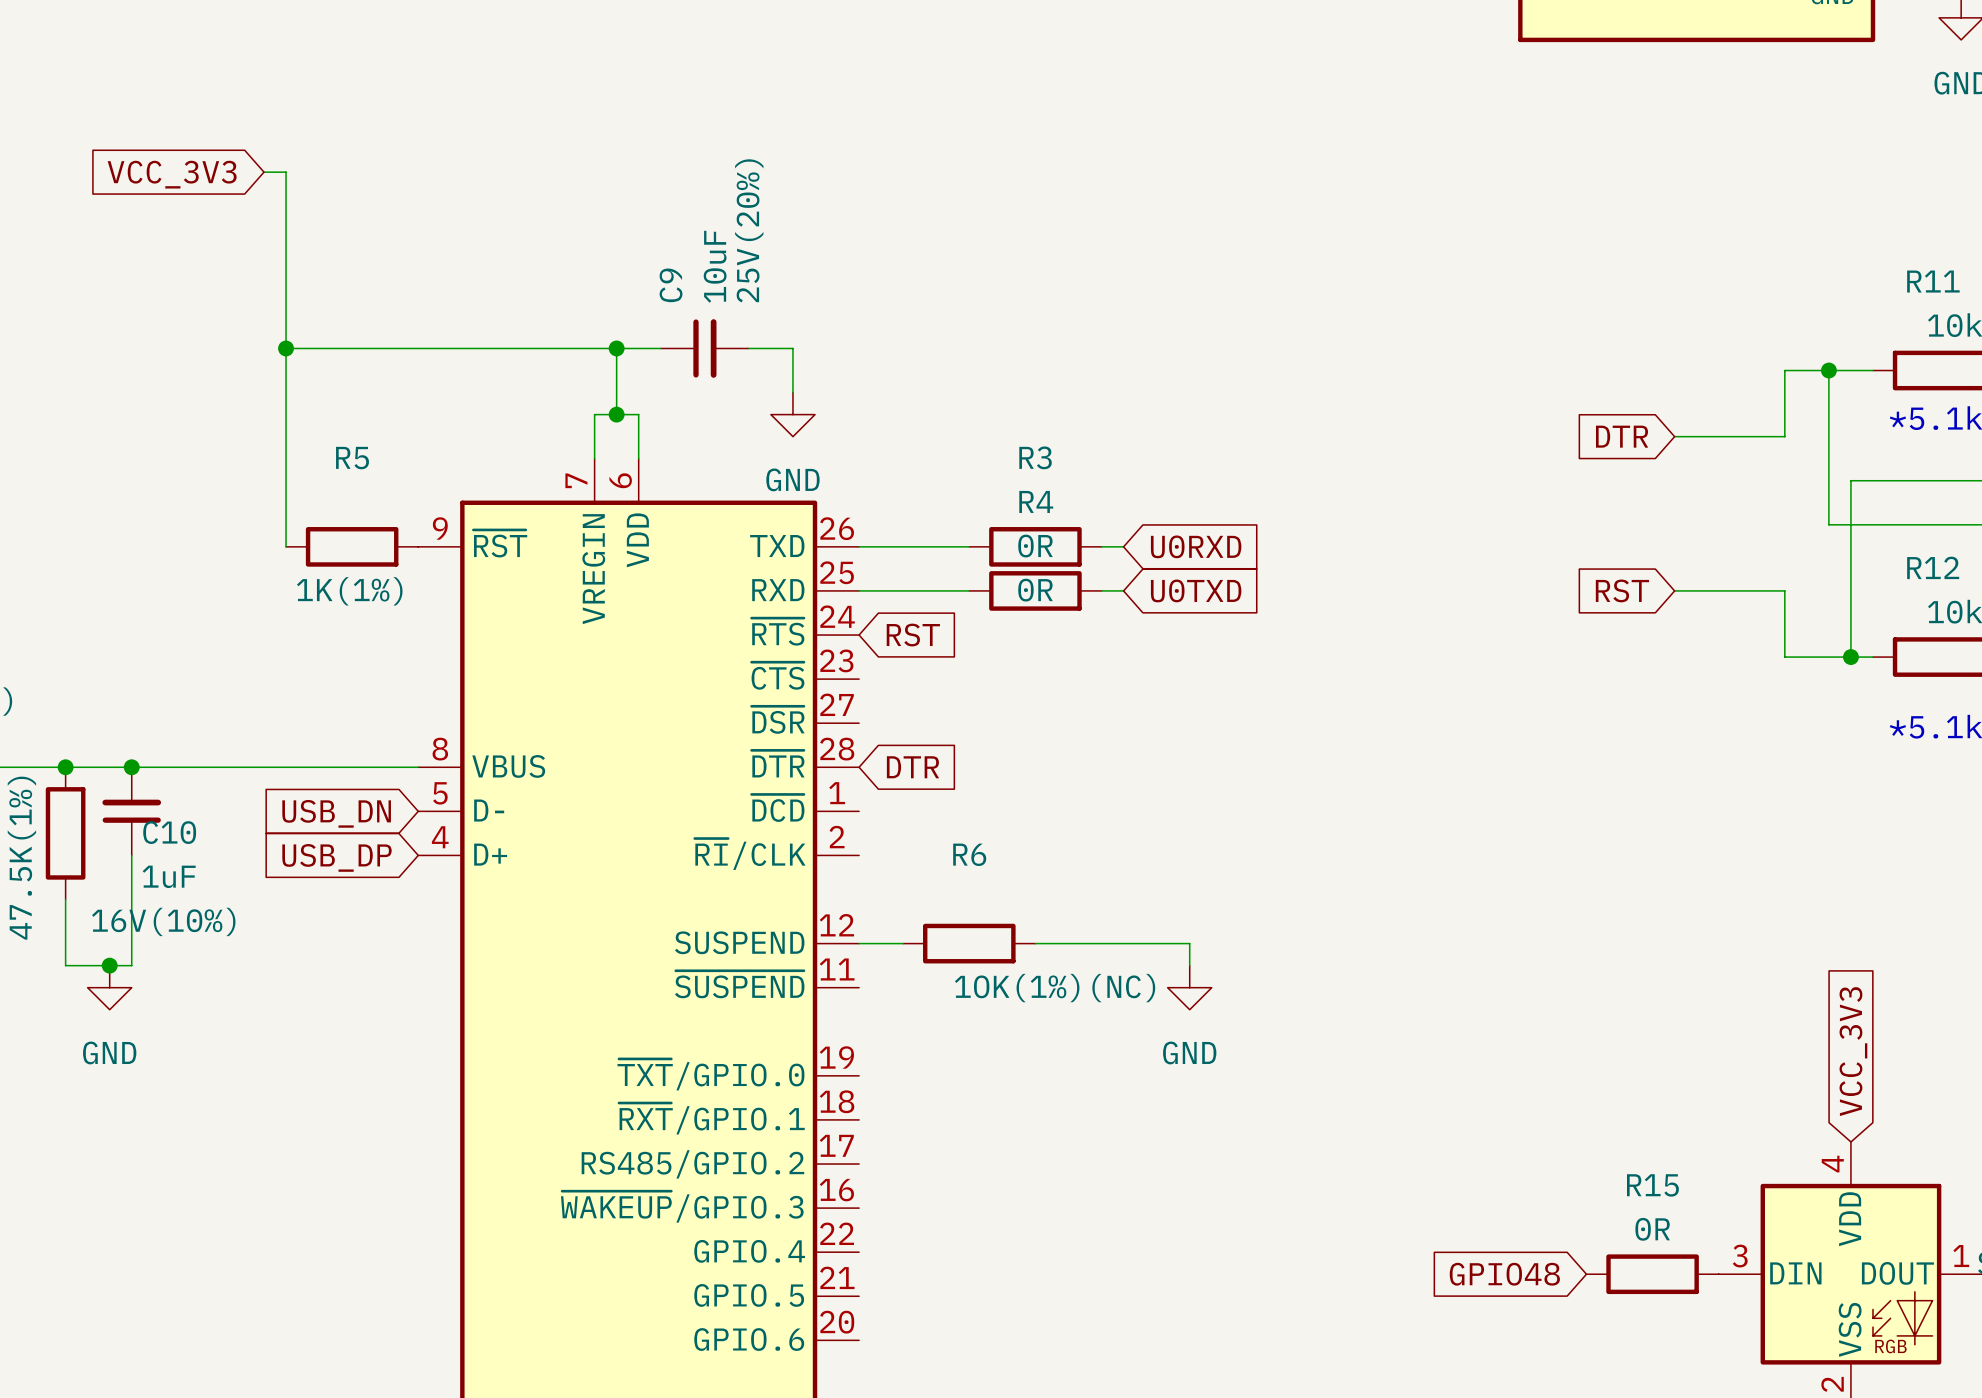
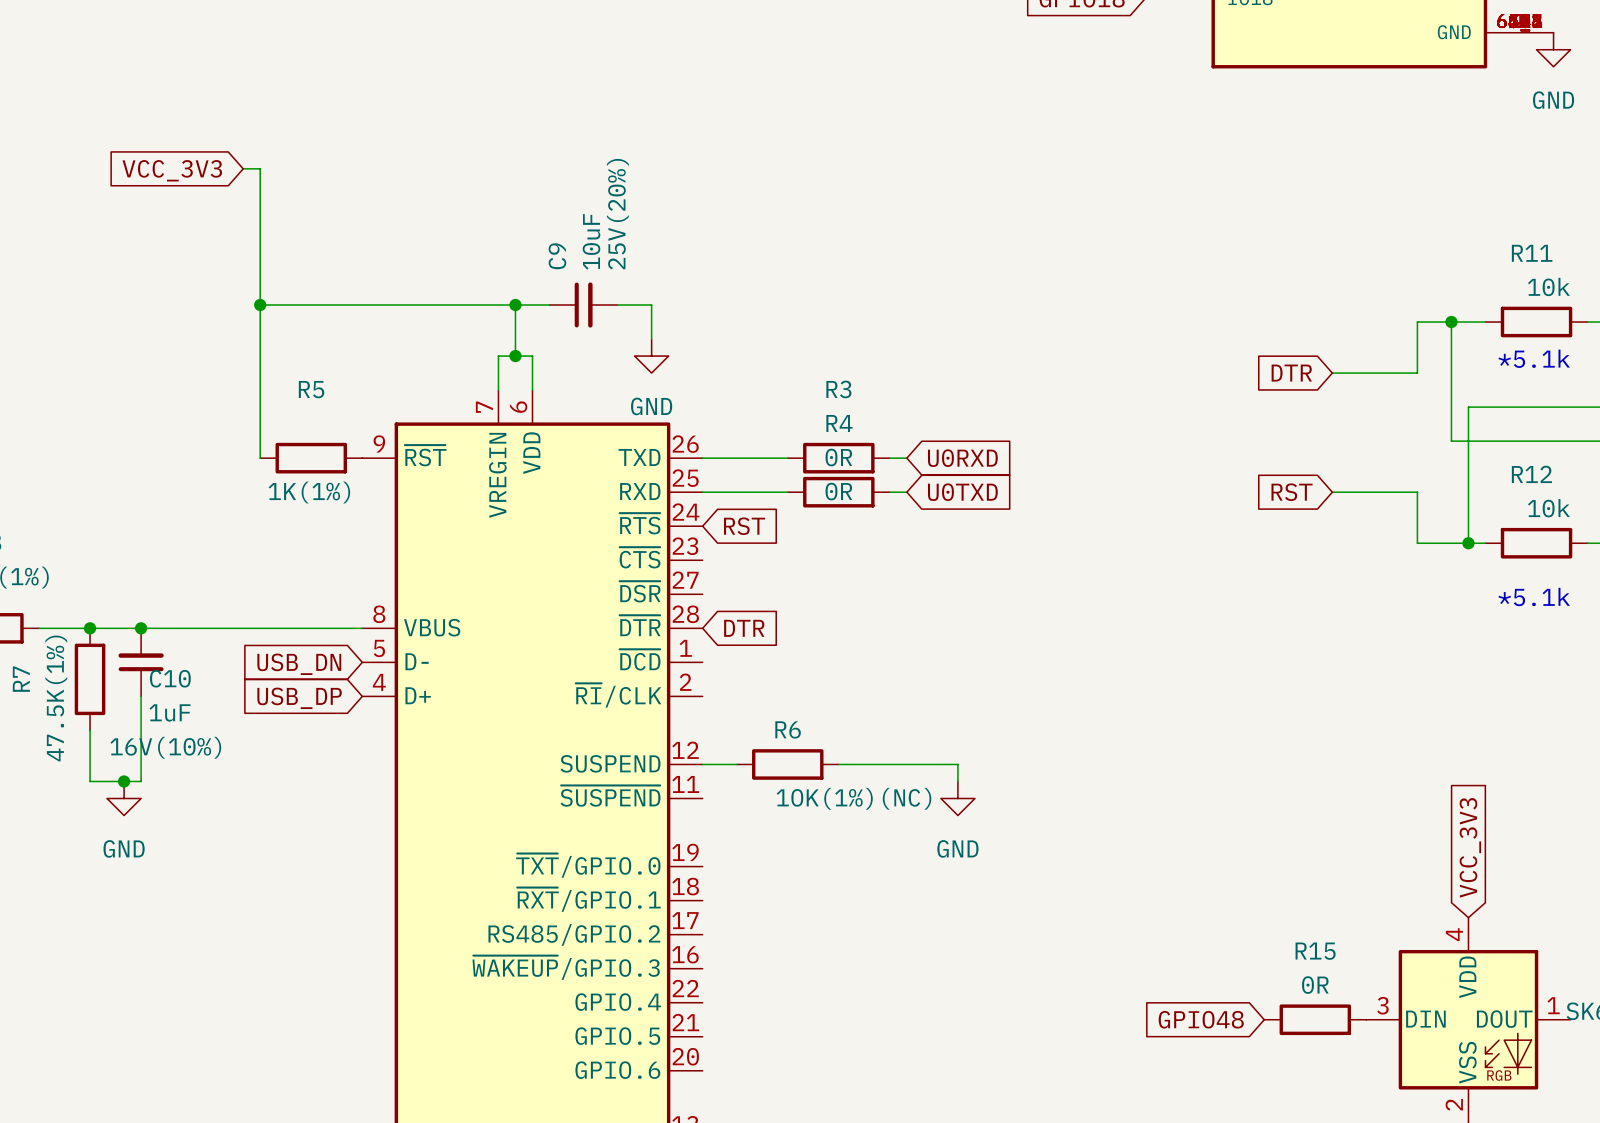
R6 name position: R6 (969, 854) -> R6 (788, 729)

